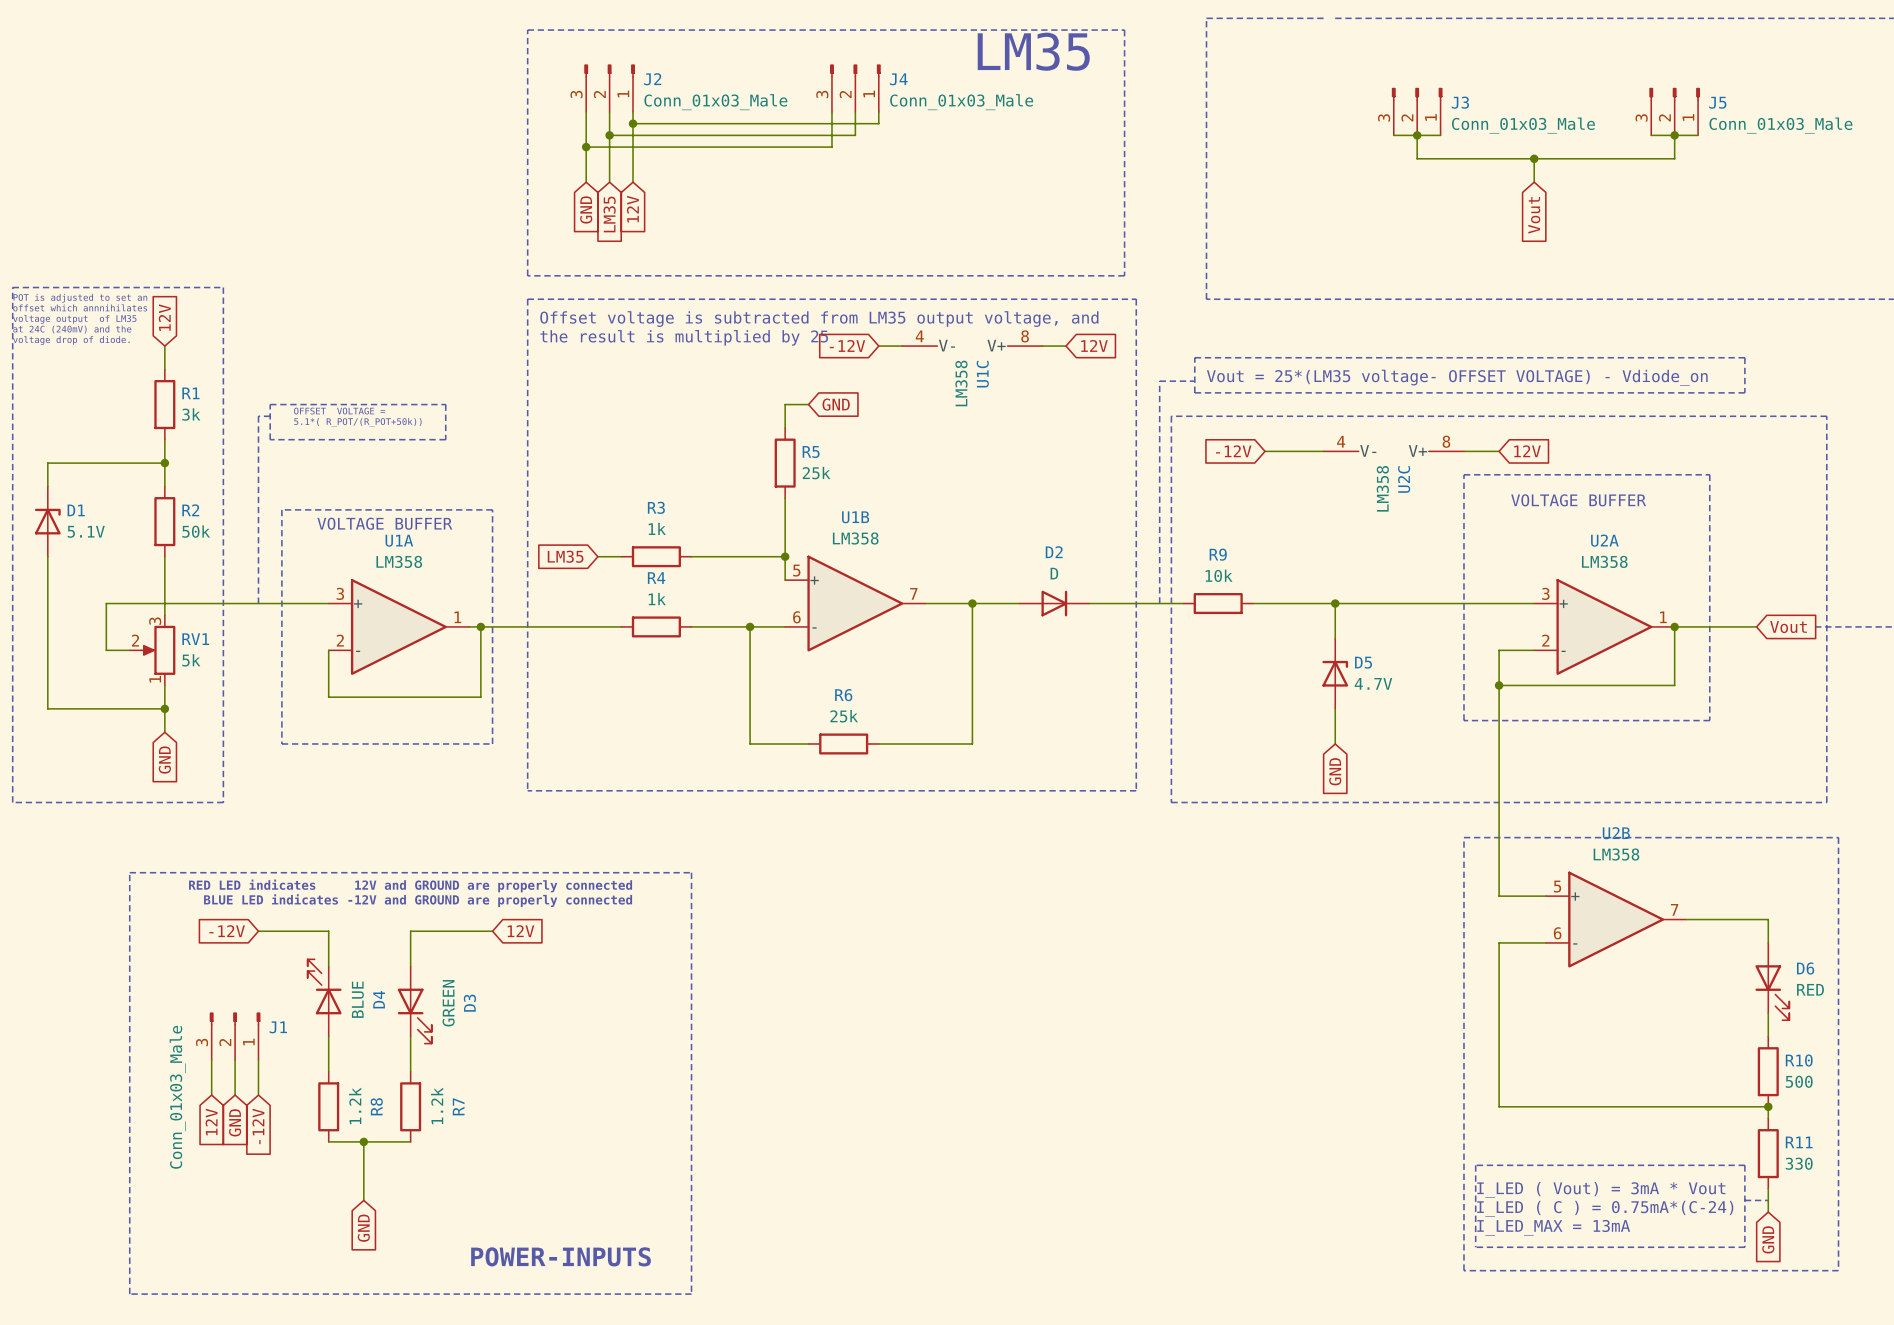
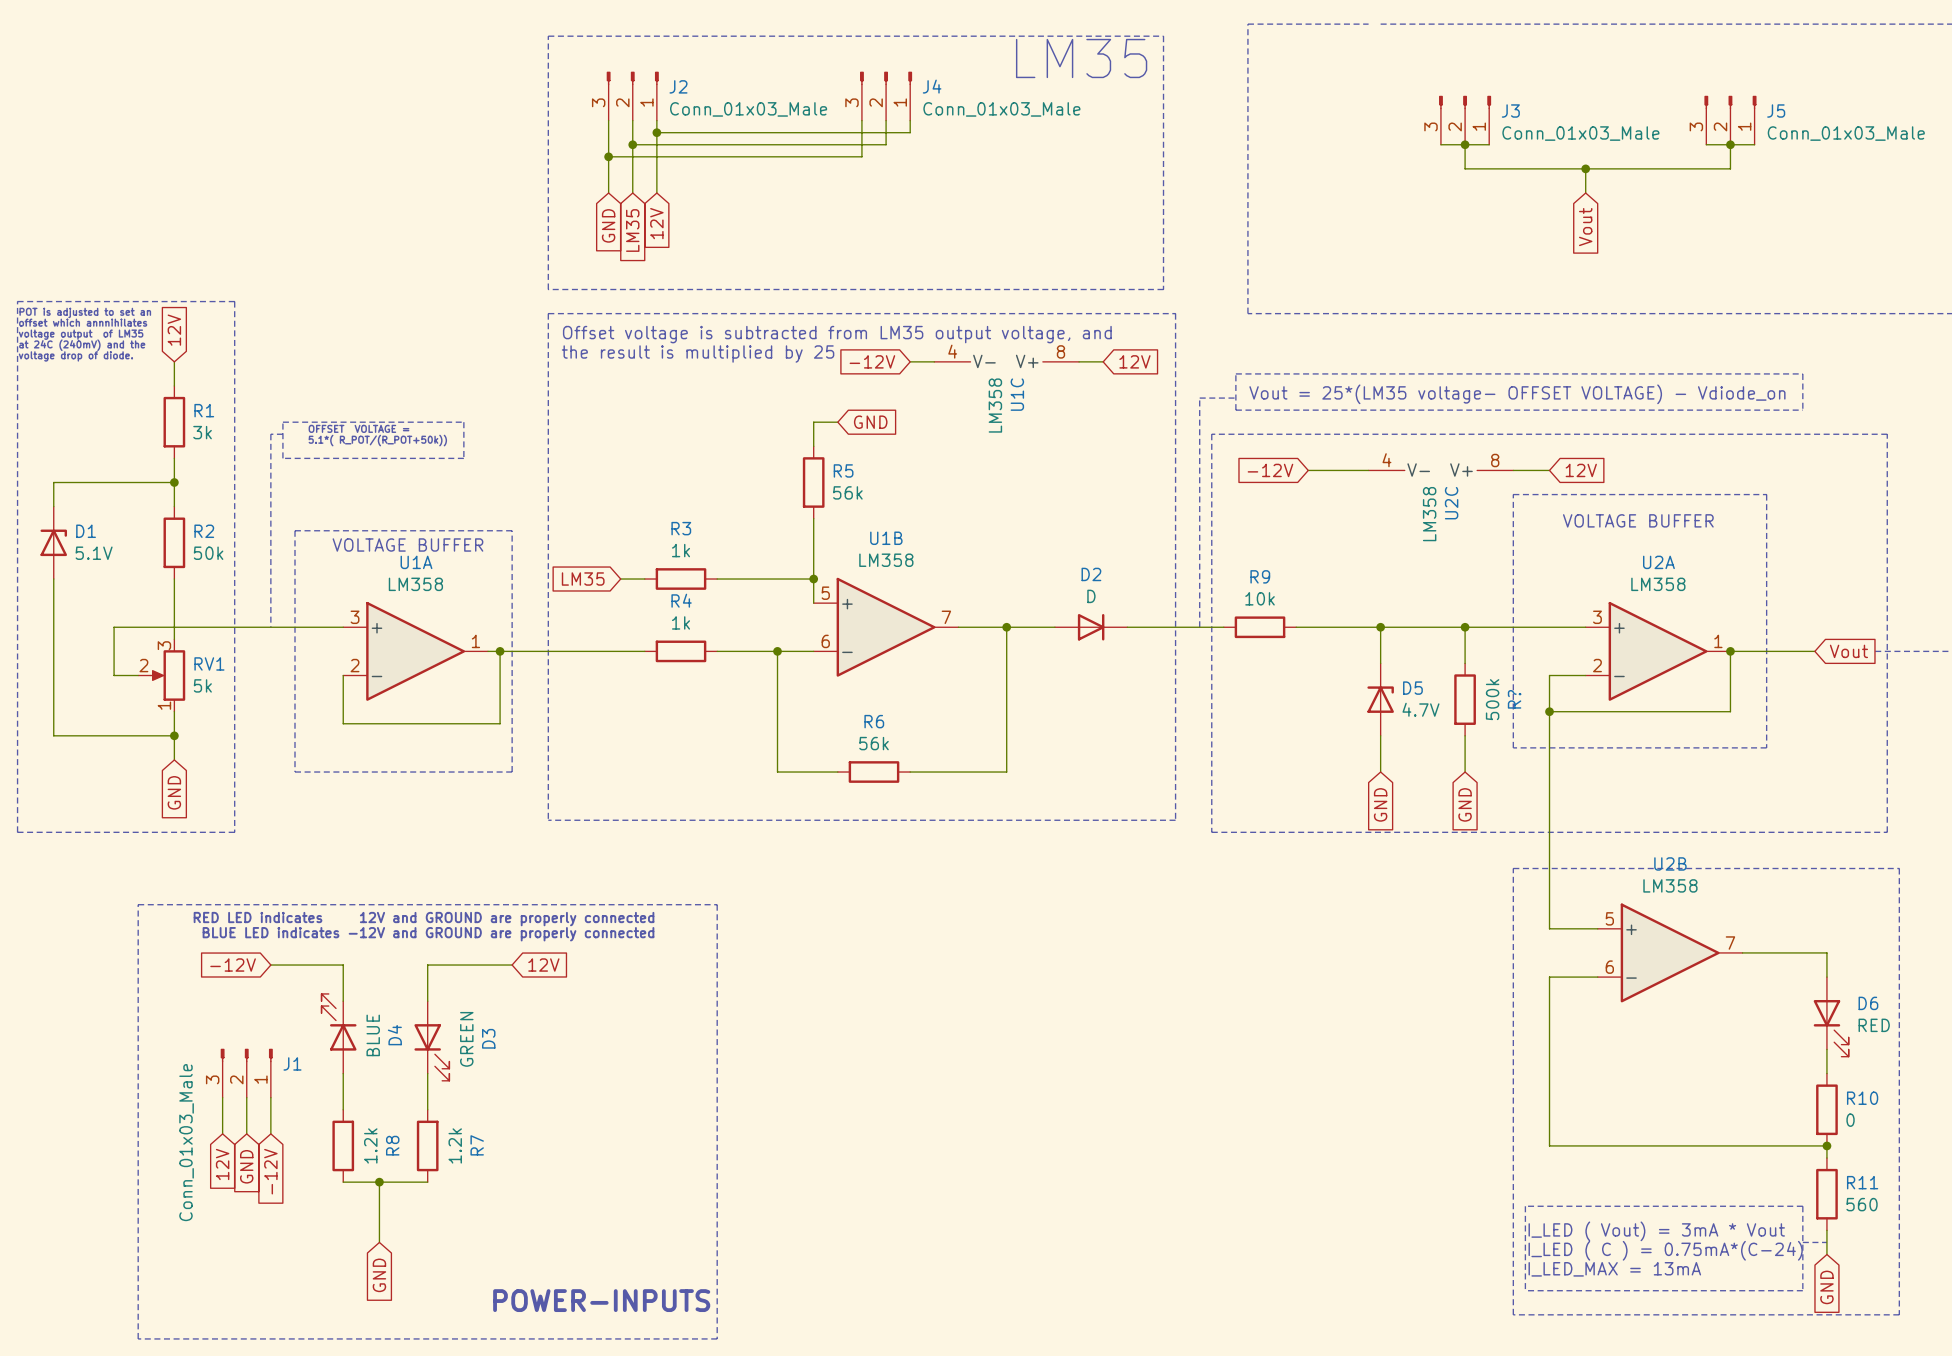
R5 value: 25k (816, 473) -> 56k (847, 492)
wire: none -> (1465, 627) (1465, 663)
junction: none -> (1465, 627)
R?: none -> 500k (1465, 699)
wire: none -> (1465, 735) (1465, 772)
R6 value: 25k (844, 716) -> 56k (874, 743)
global label: none -> GND (1465, 804)
R10 value: 500 (1799, 1081) -> 0 (1850, 1120)
R11 value: 330 (1799, 1163) -> 560 (1862, 1204)

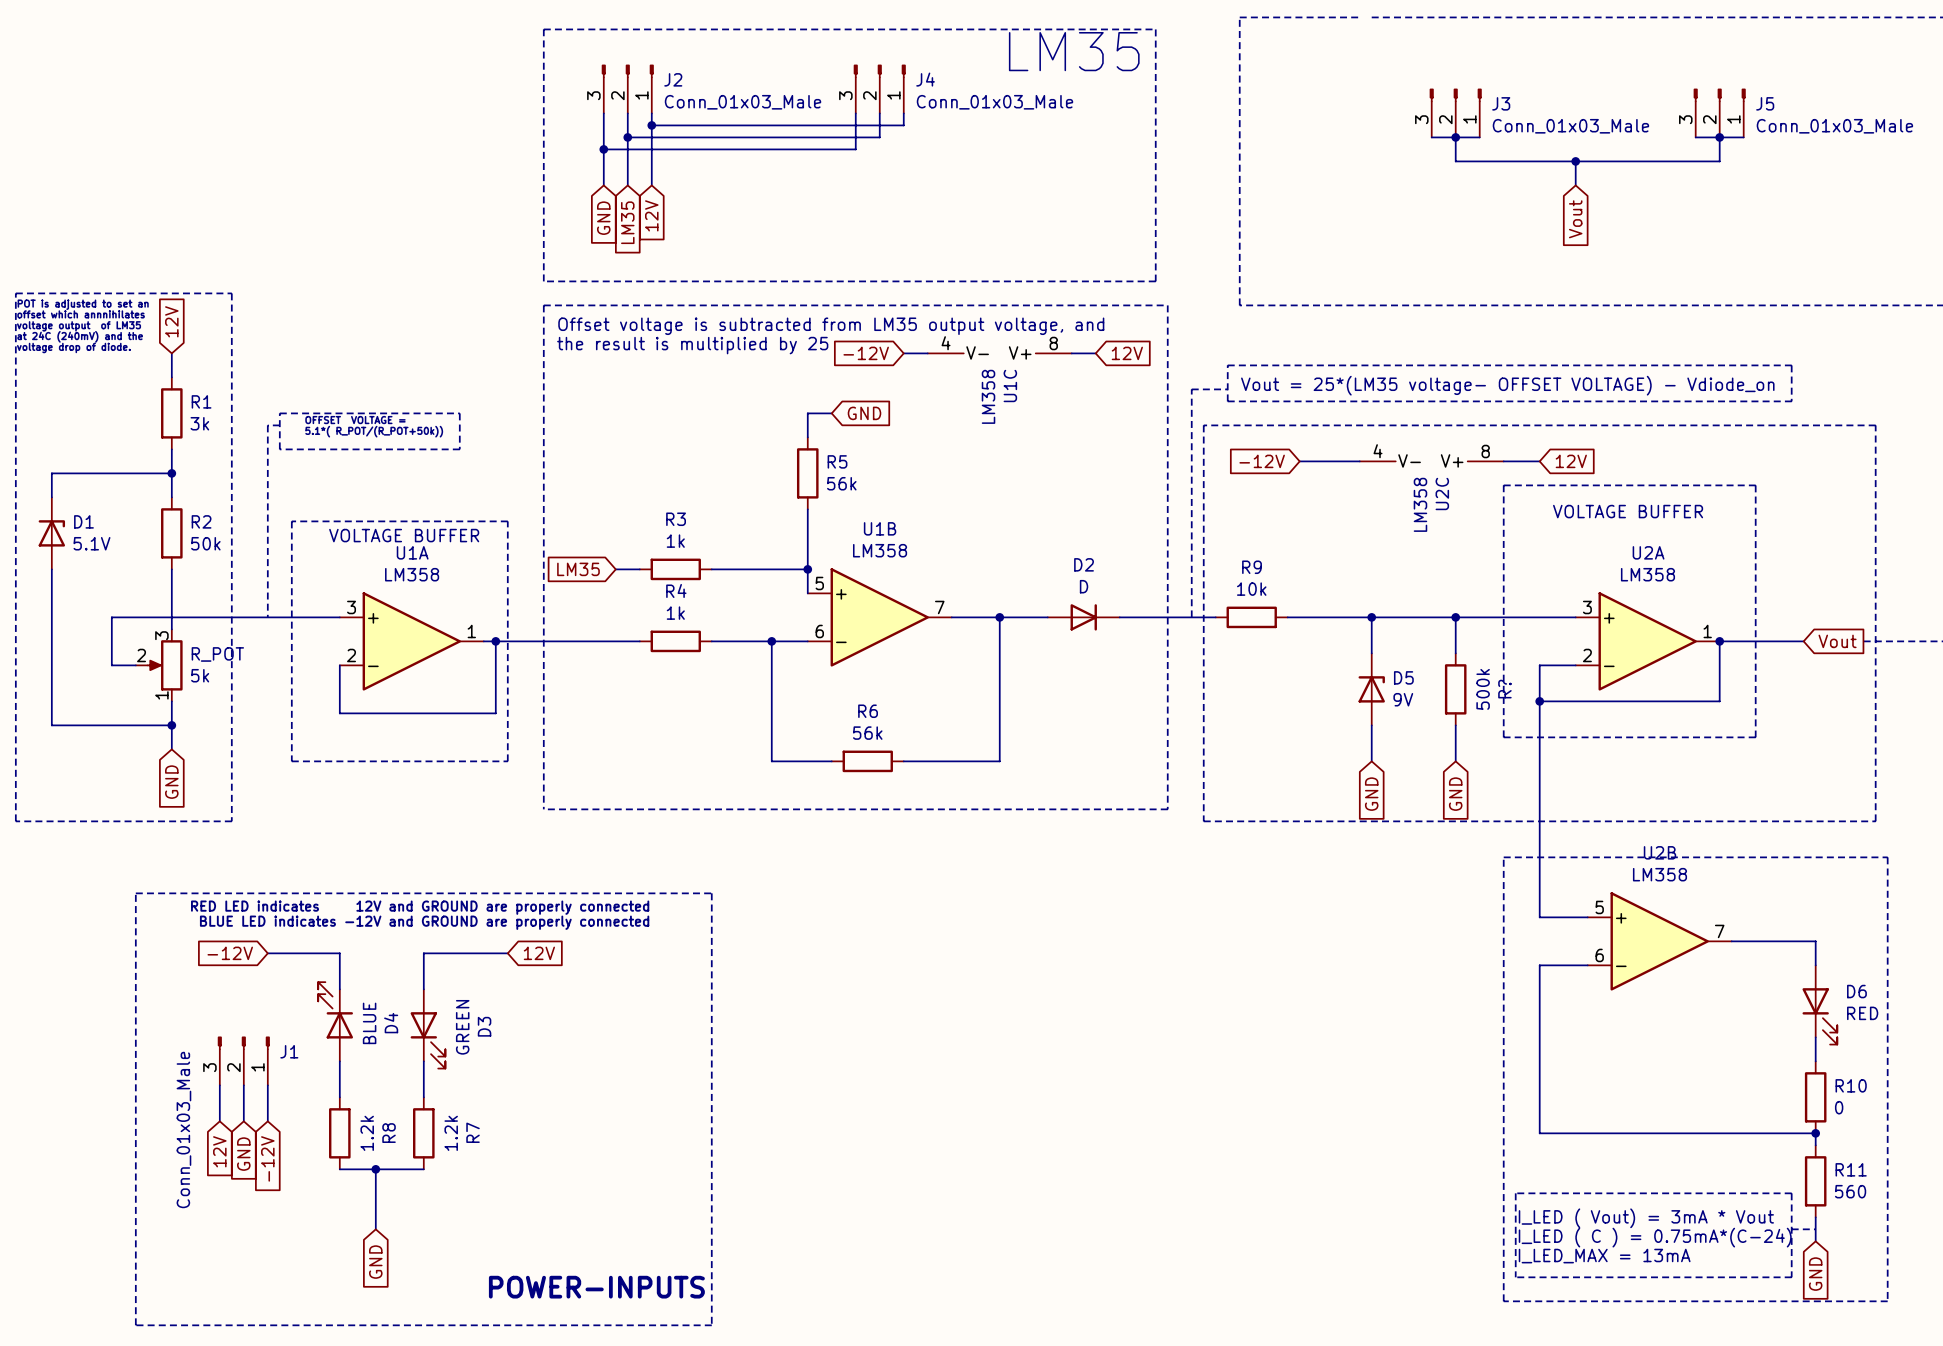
RV1 name: RV1 (209, 663) -> R_POT (217, 654)
D5 value: 4.7V (1420, 709) -> 9V (1403, 699)

